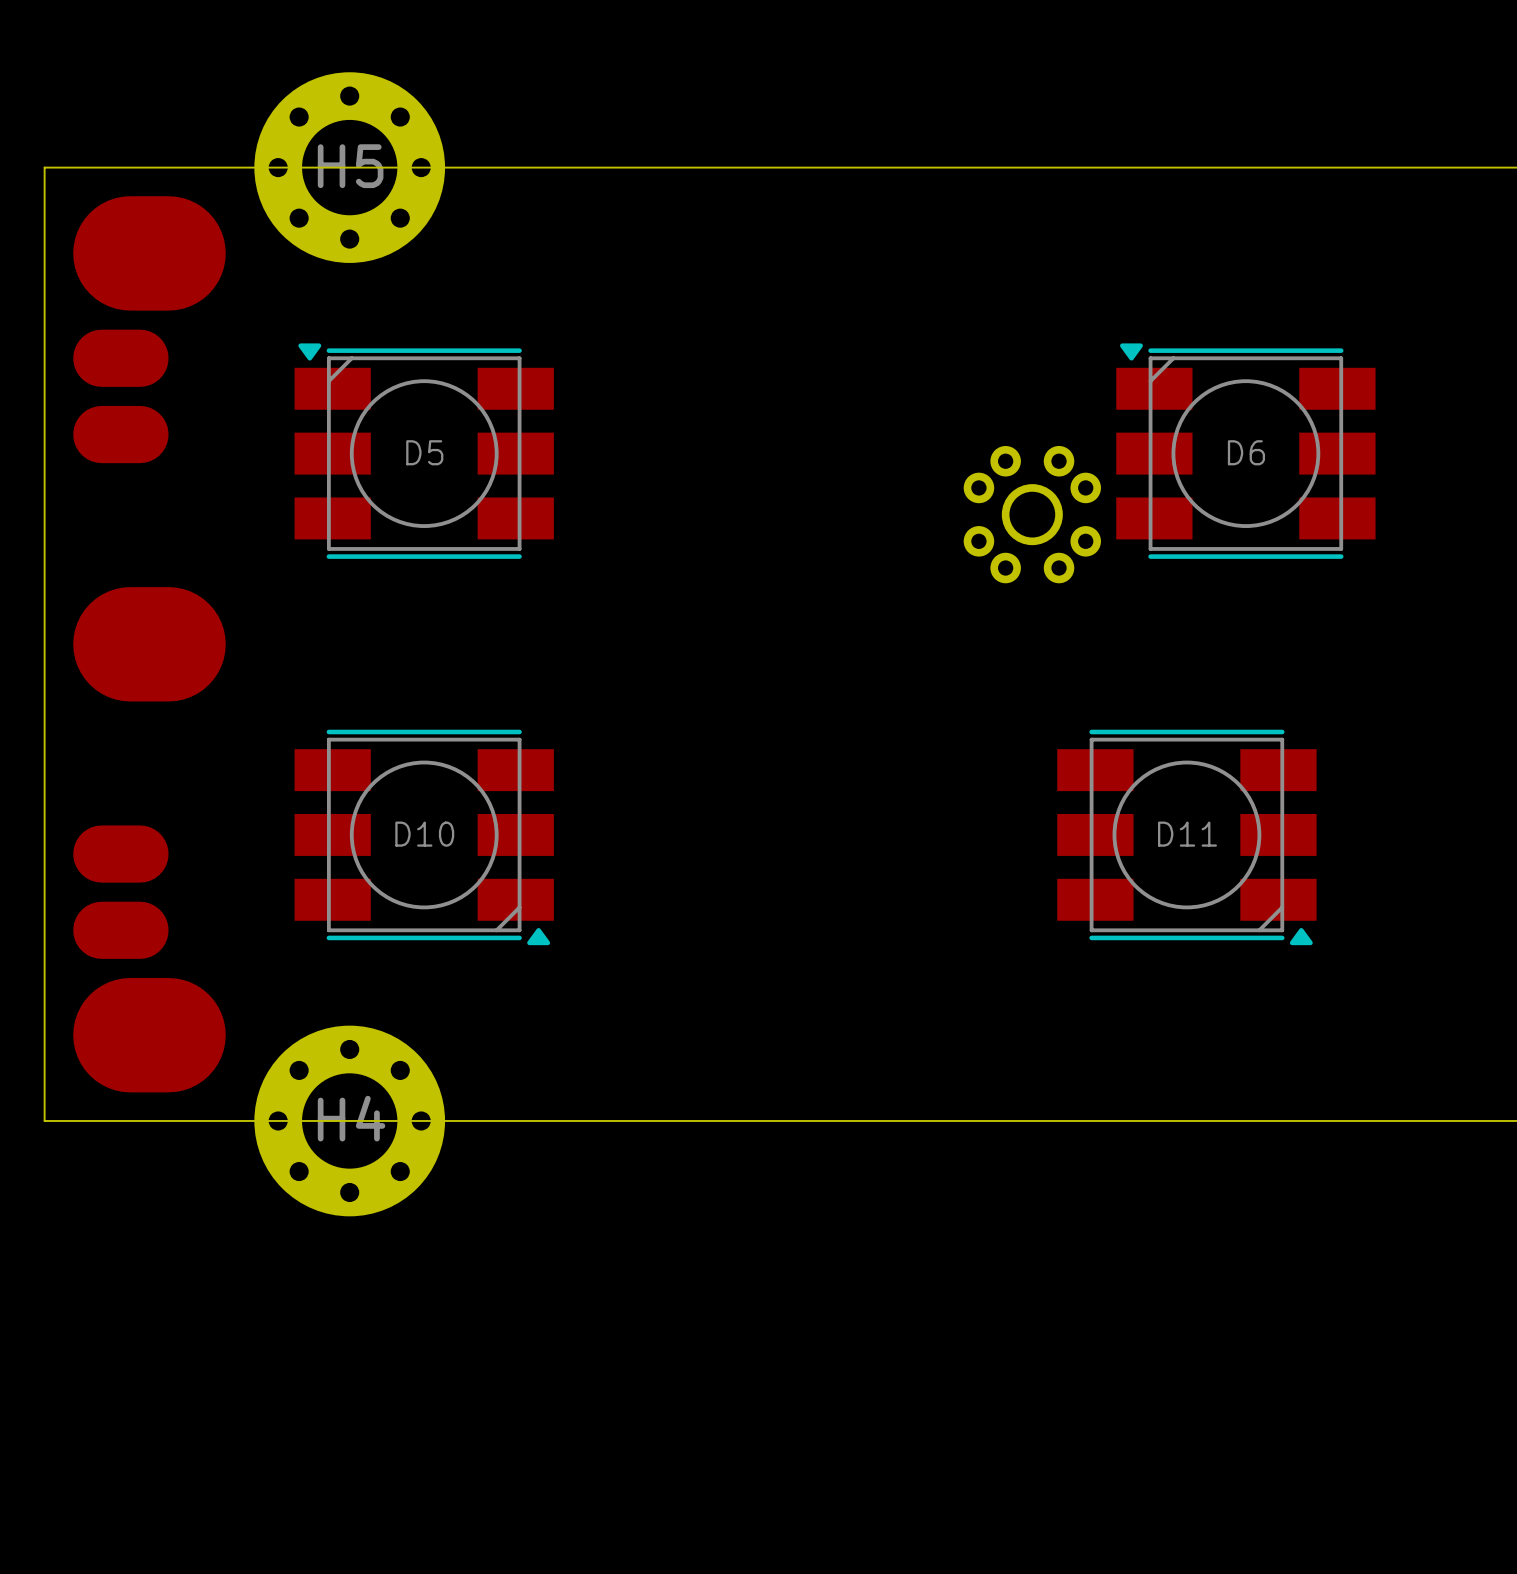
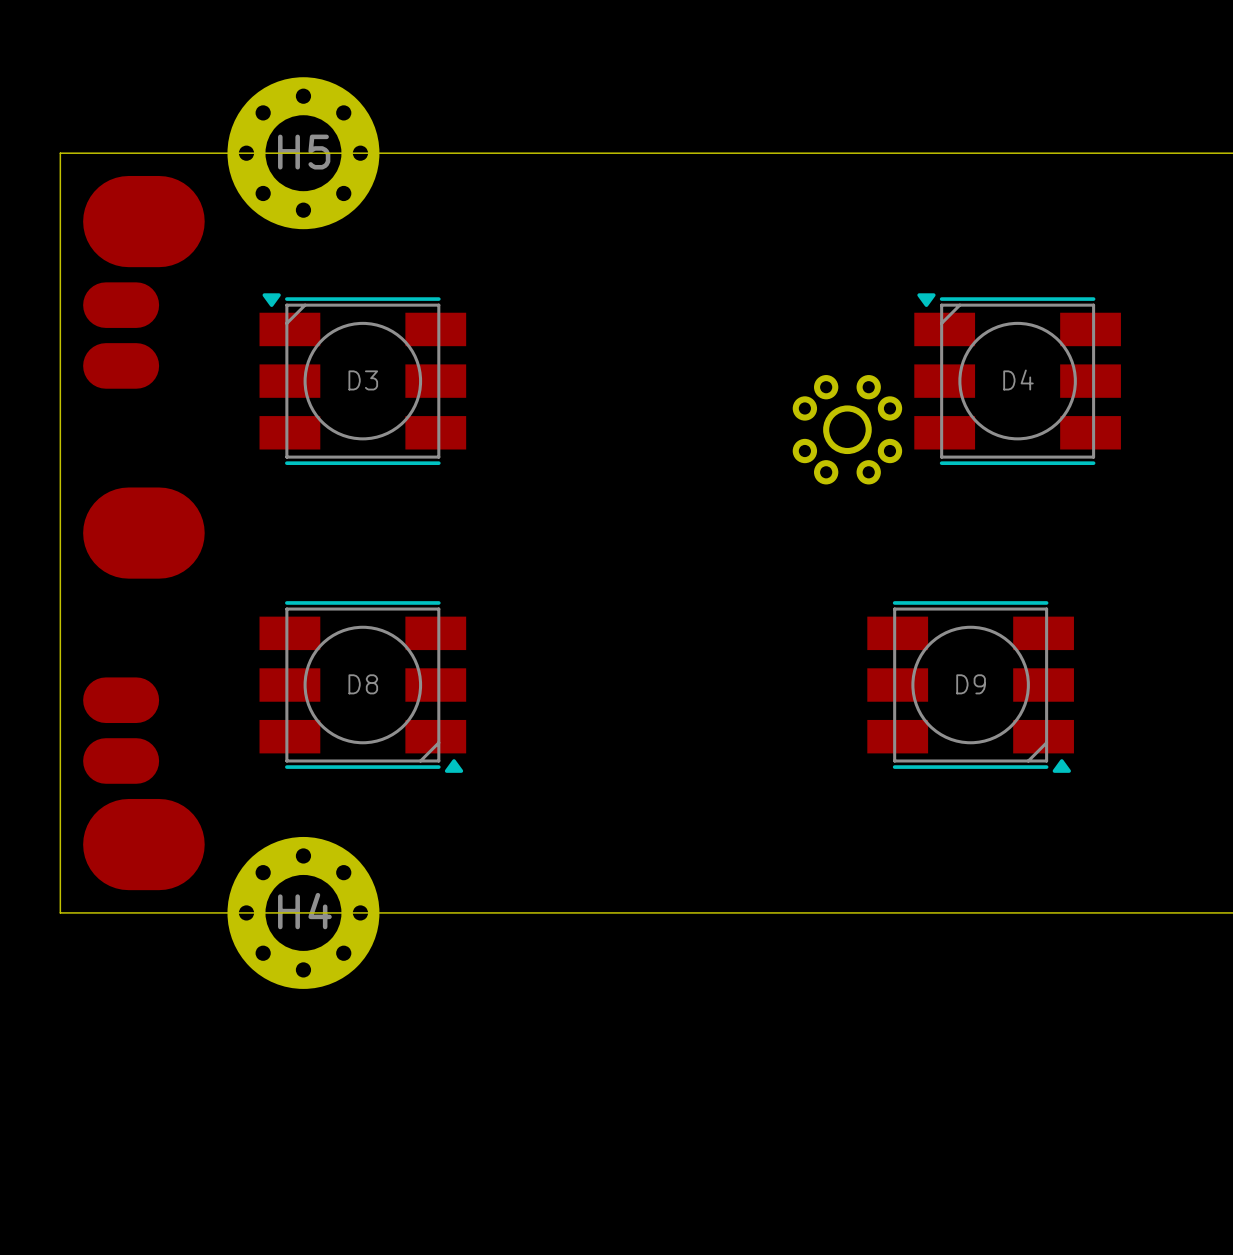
D5 name: D5 (424, 452) -> D3 (363, 380)
D6 name: D6 (1246, 452) -> D4 (1018, 380)
D10 name: D10 (424, 834) -> D8 (363, 684)
D11 name: D11 (1187, 834) -> D9 (971, 684)

